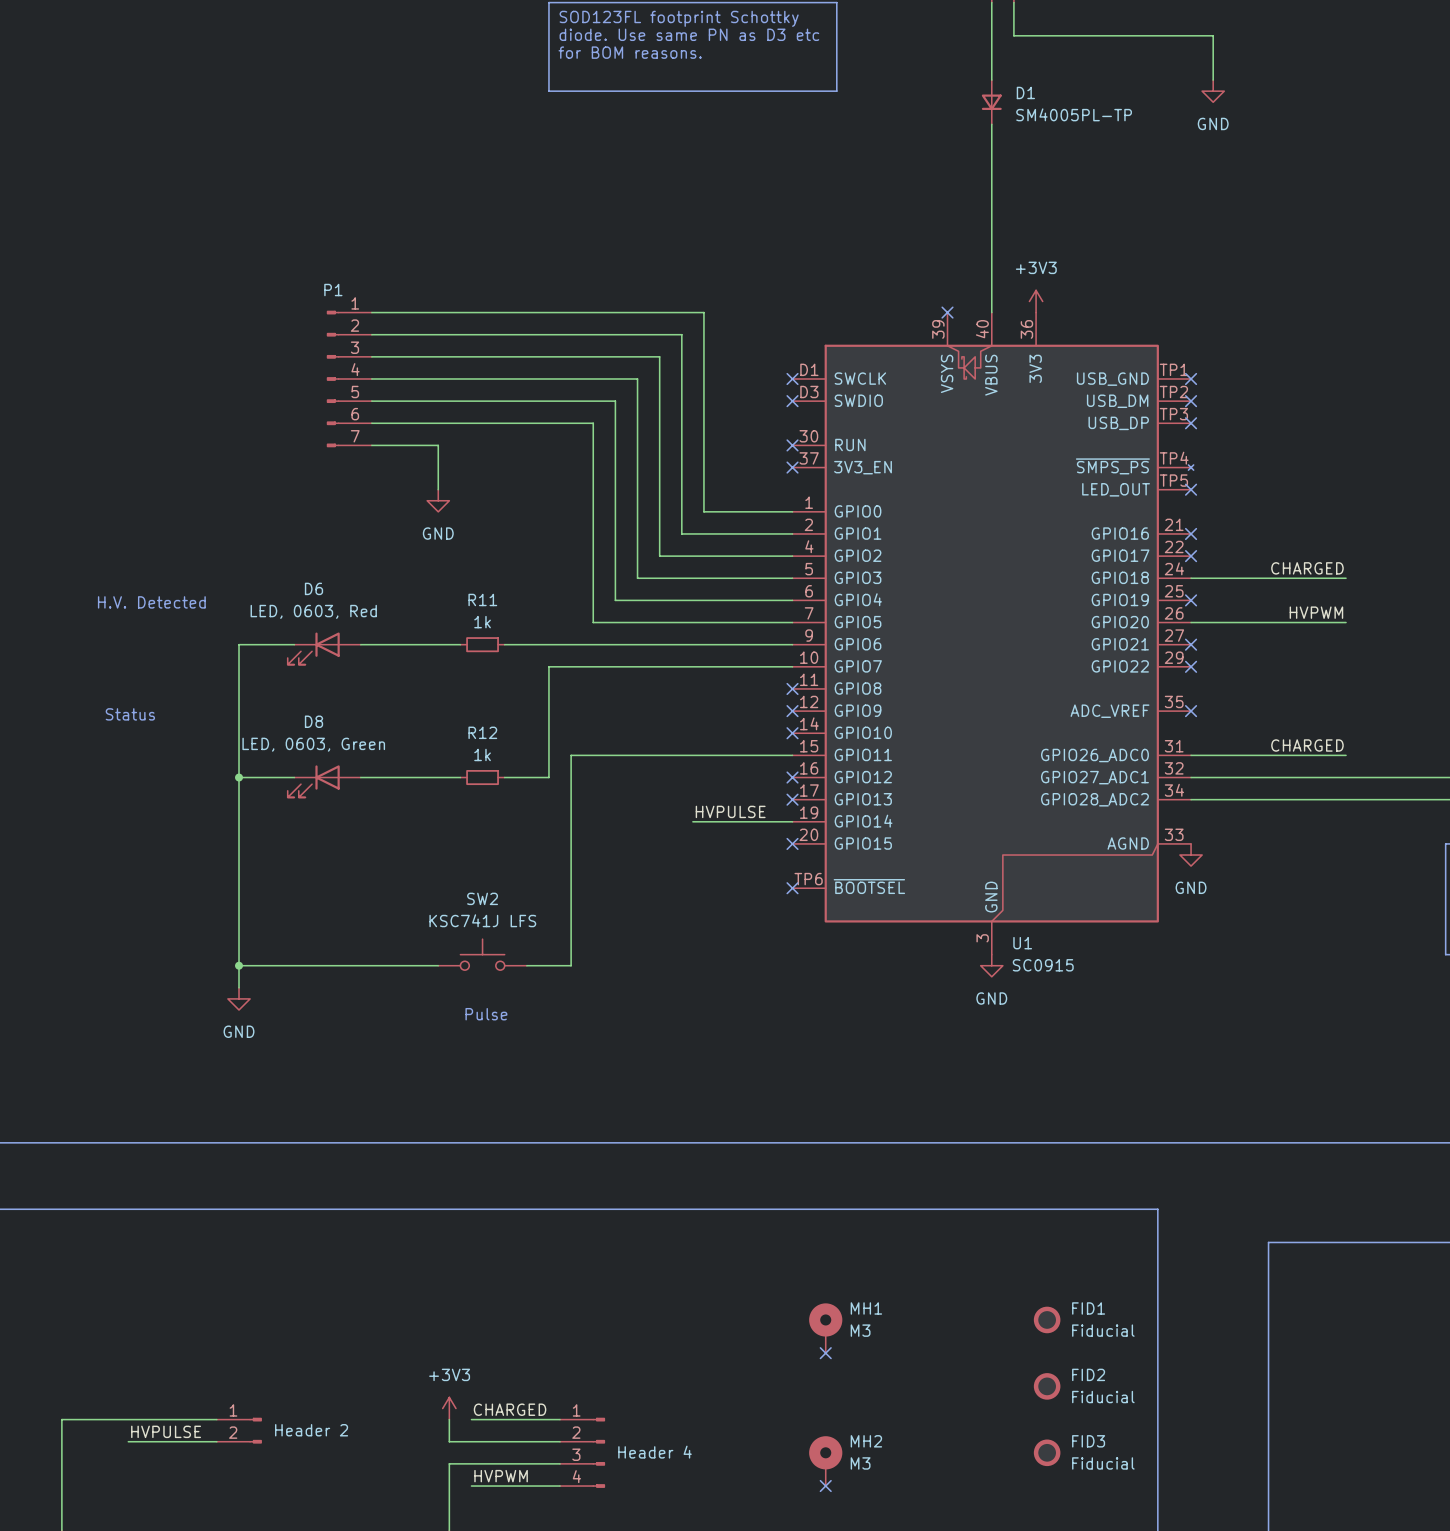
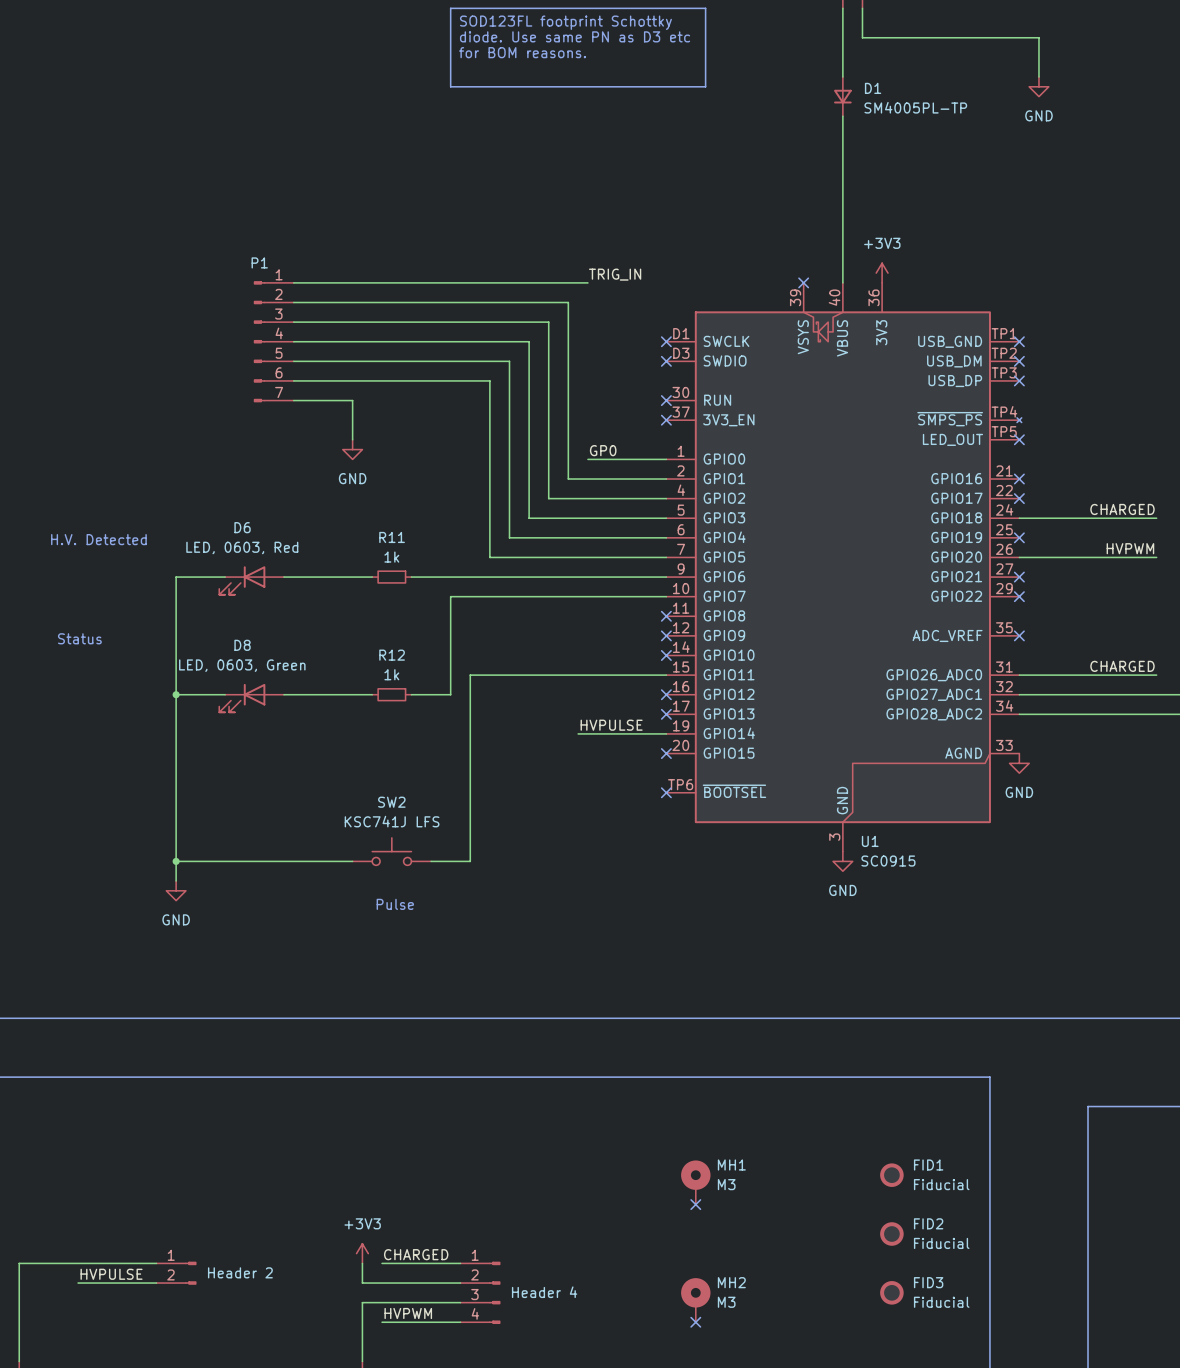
label: none -> TRIG_IN (615, 274)
wire: (703, 312) (703, 511) -> none
label: none -> GP0 (603, 450)

